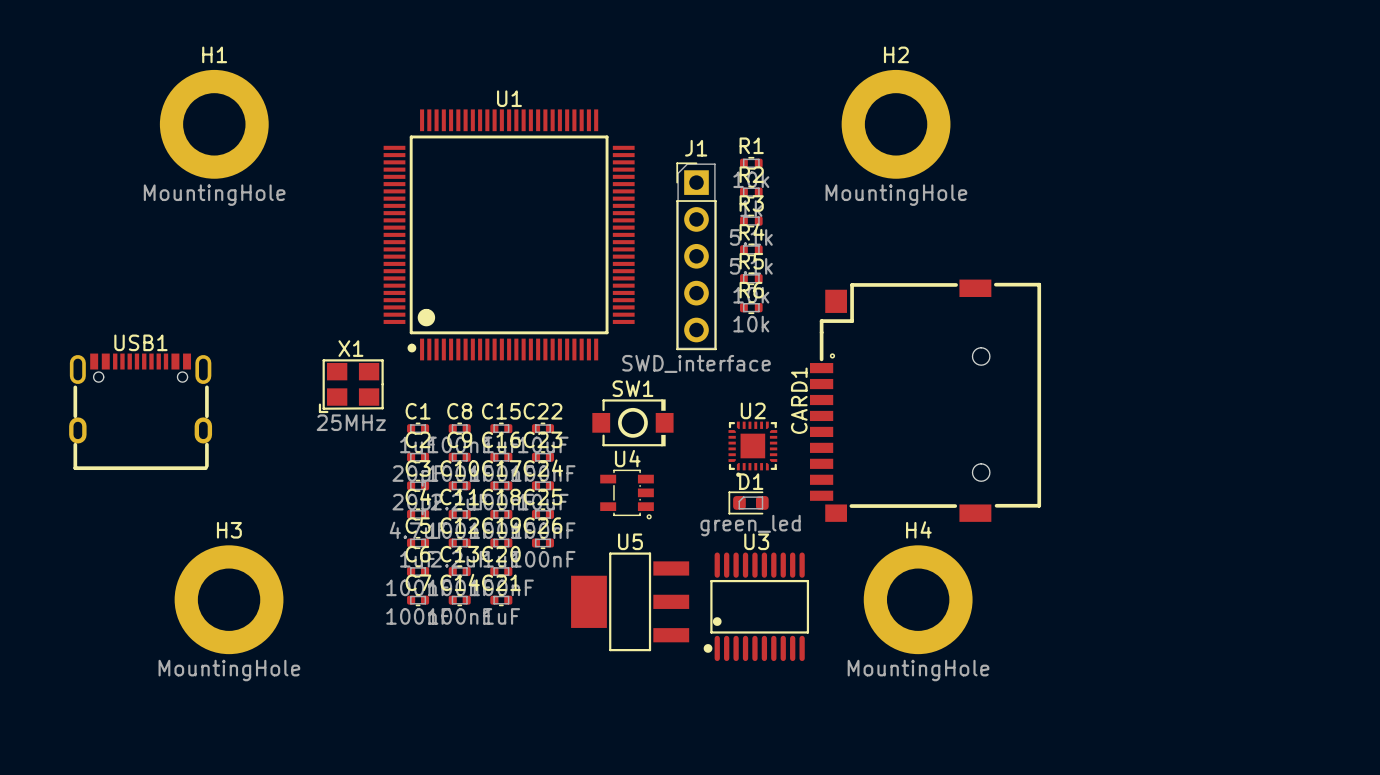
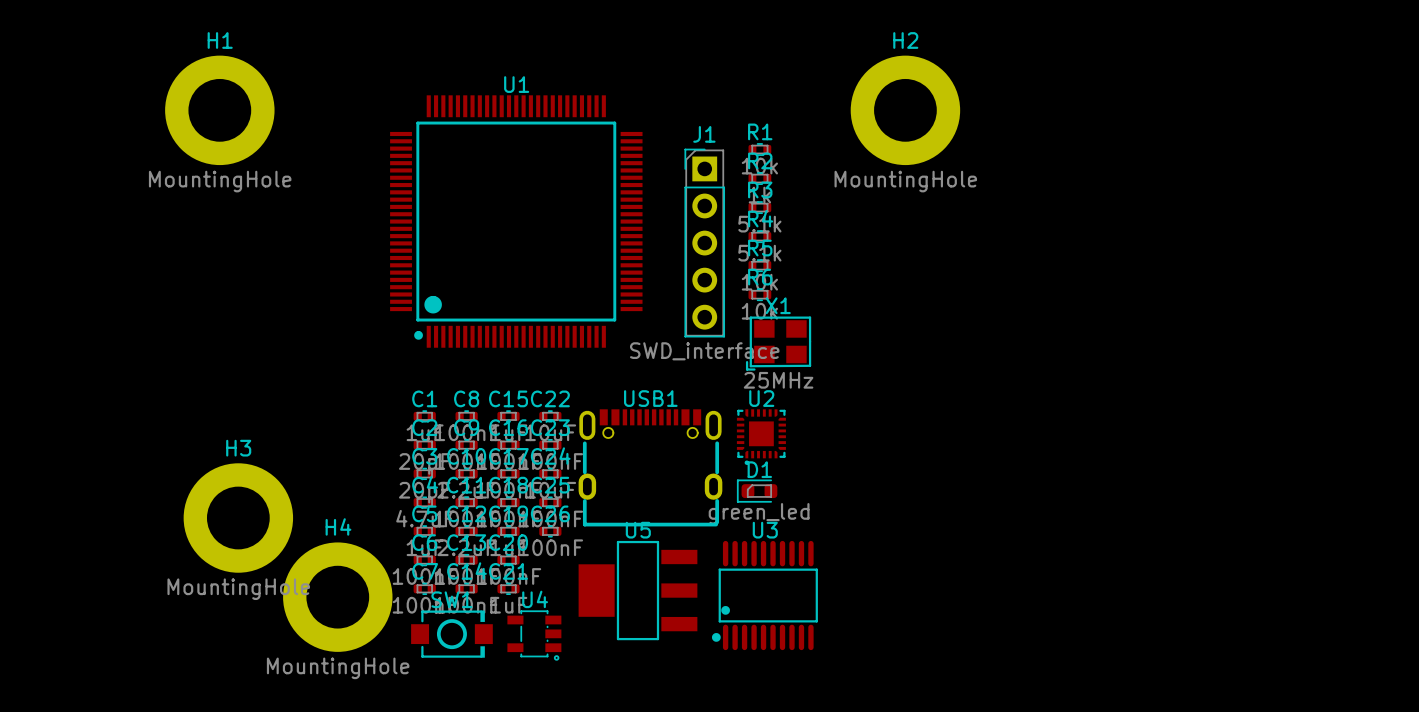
X1 position: (351, 386) -> (778, 343)
CARD1: (925, 400) -> none
USB1 position: (140, 411) -> (650, 467)
SW1 position: (632, 422) -> (451, 634)
U4 position: (627, 494) -> (534, 635)
H3 position: (229, 599) -> (238, 518)
H4 position: (918, 599) -> (337, 597)

